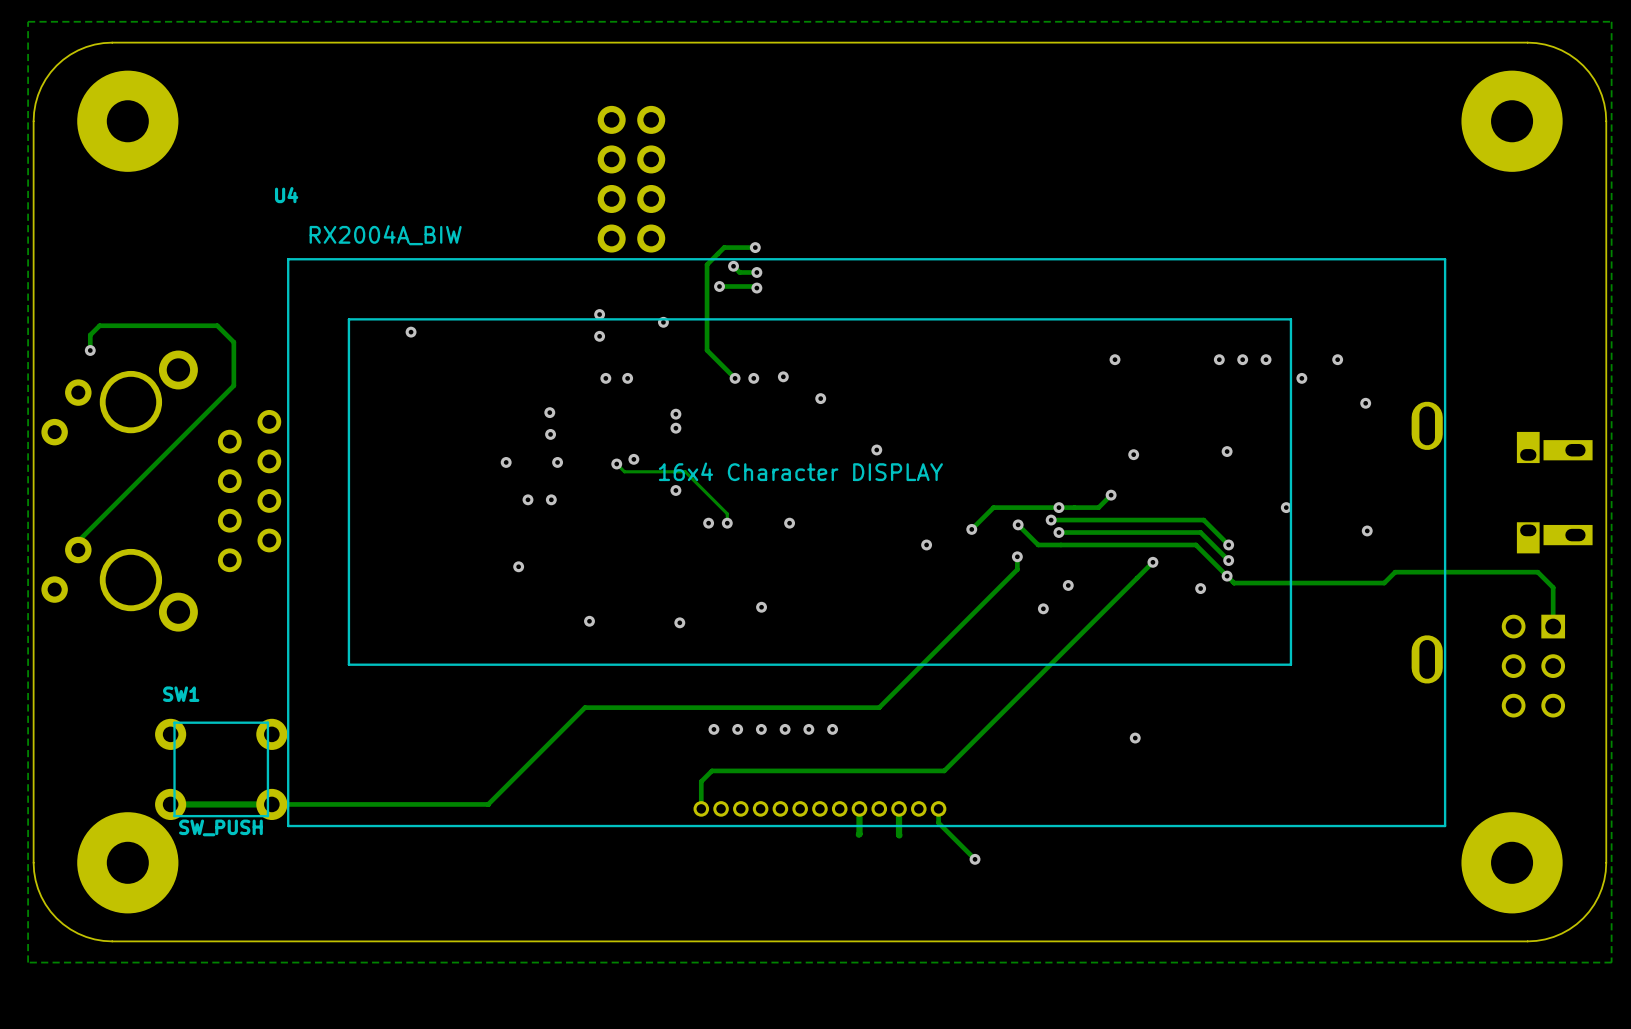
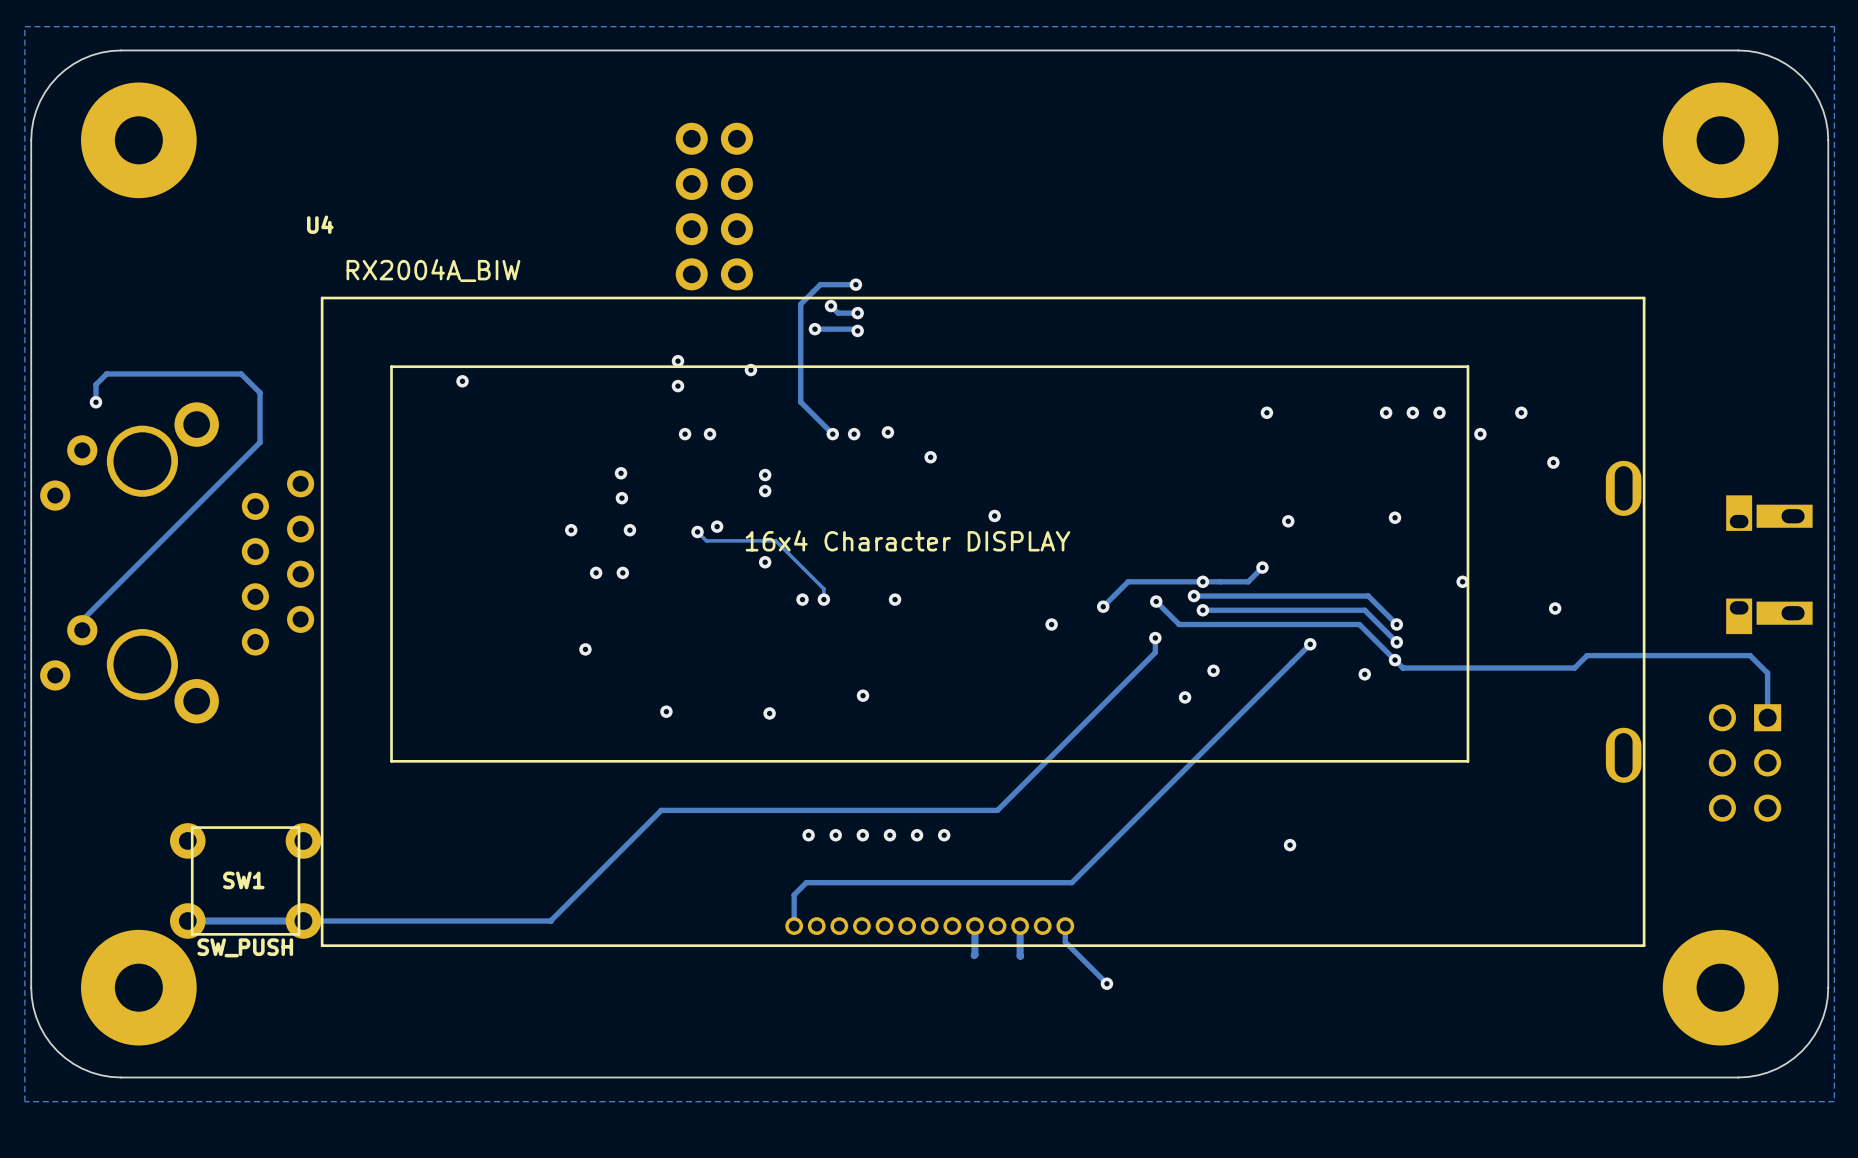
SW1 name position: SW1 (181, 694) -> SW1 (243, 880)

